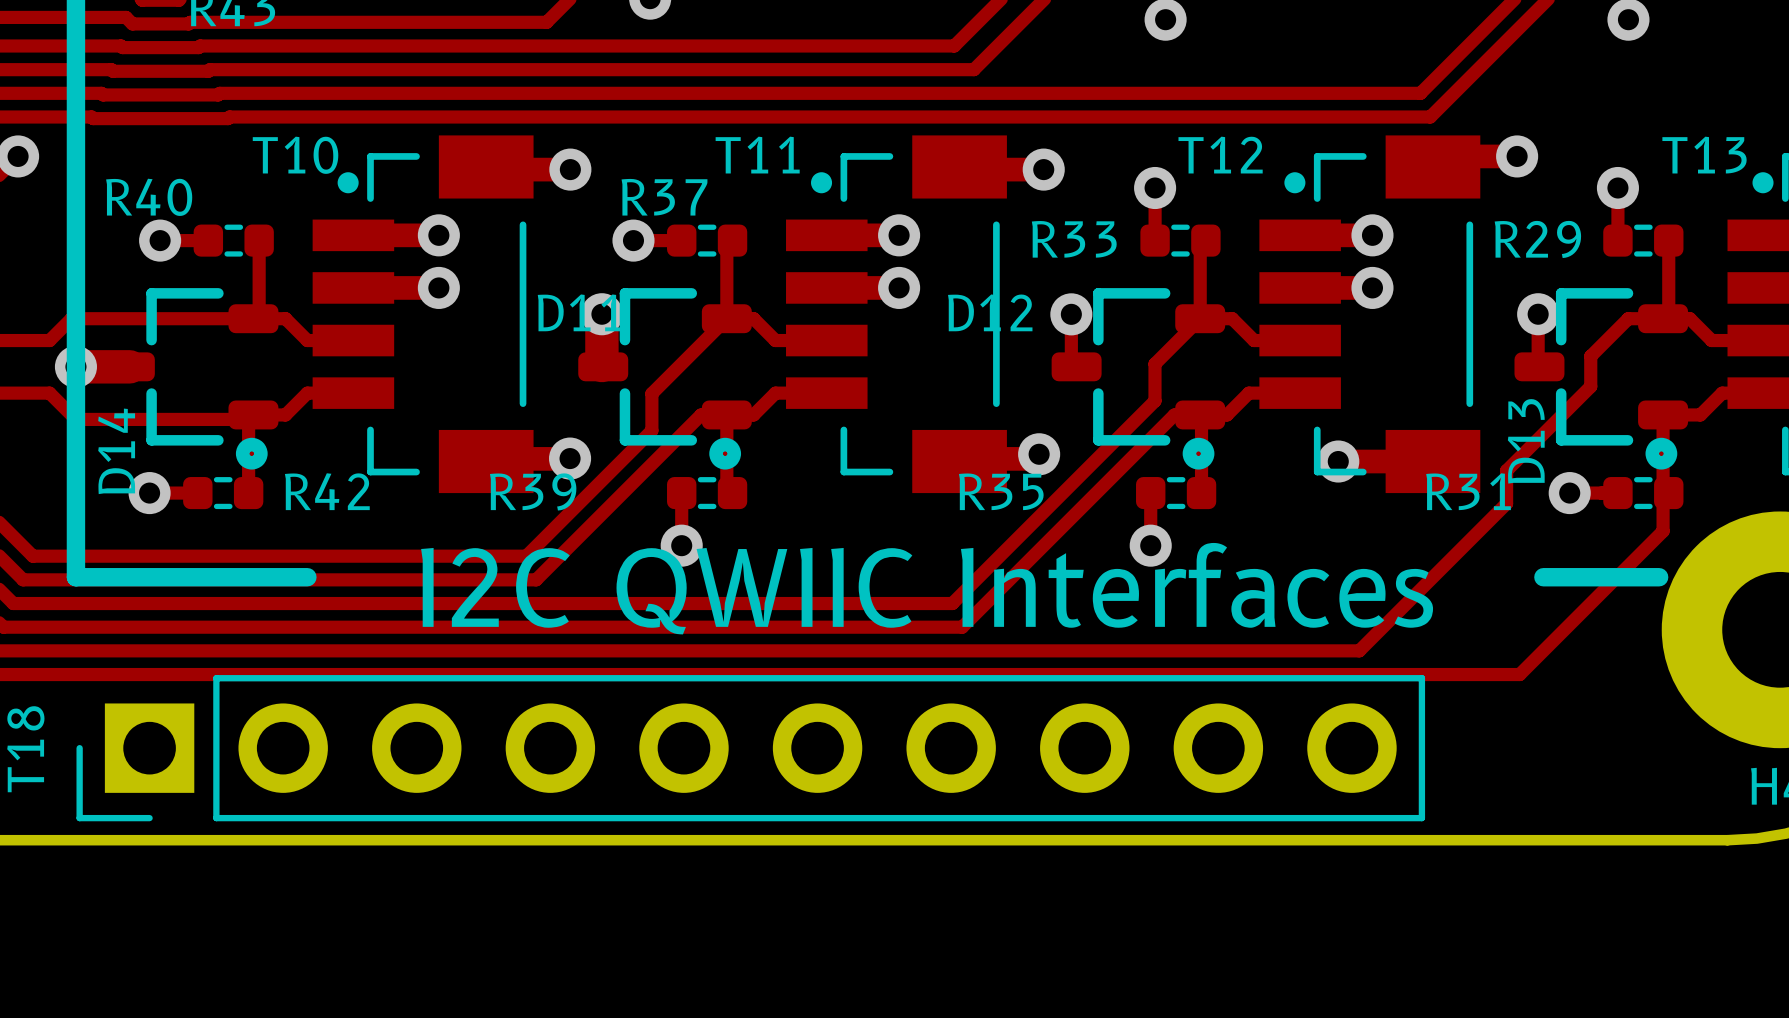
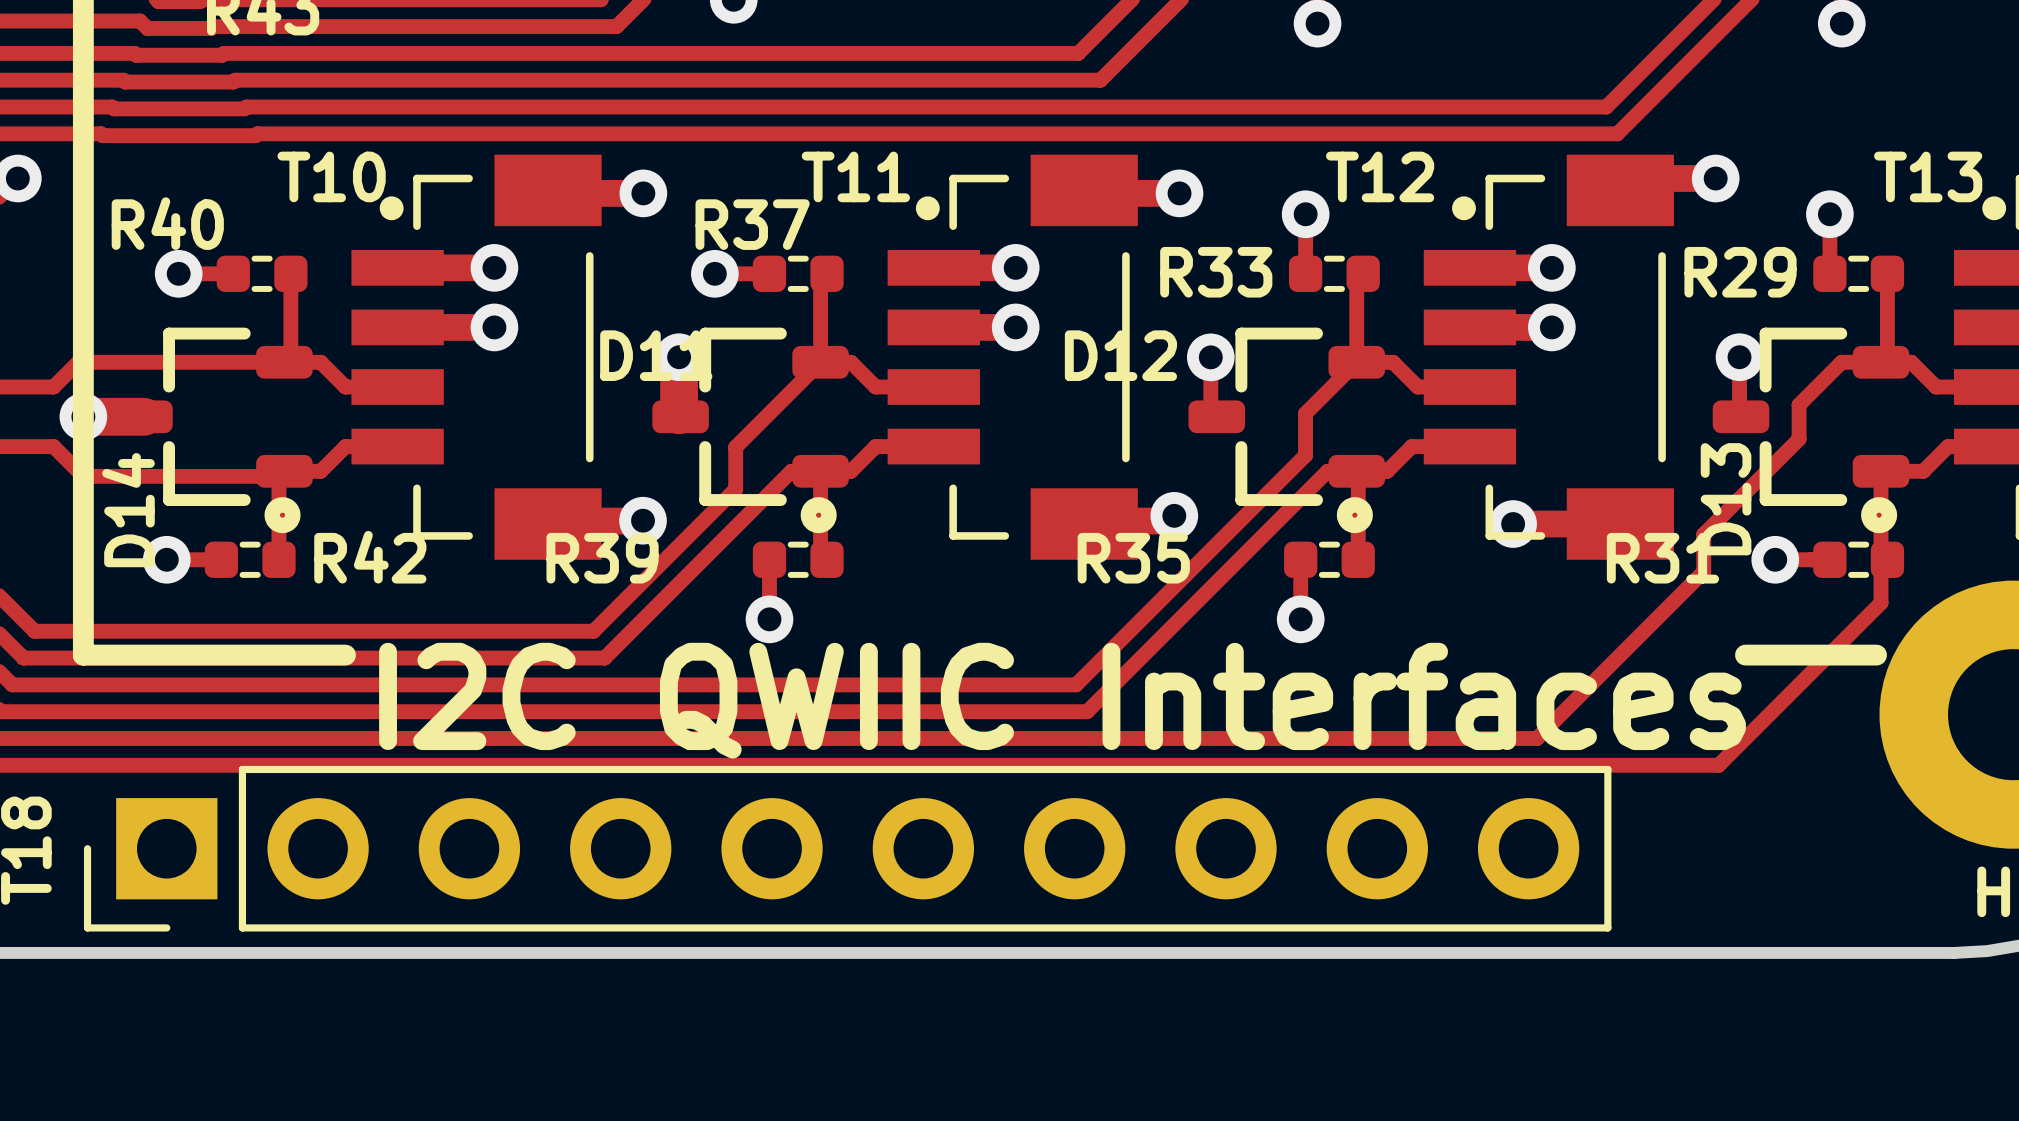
text position: I2C QWIIC Interfaces (927, 588) -> I2C QWIIC Interfaces (1062, 700)

